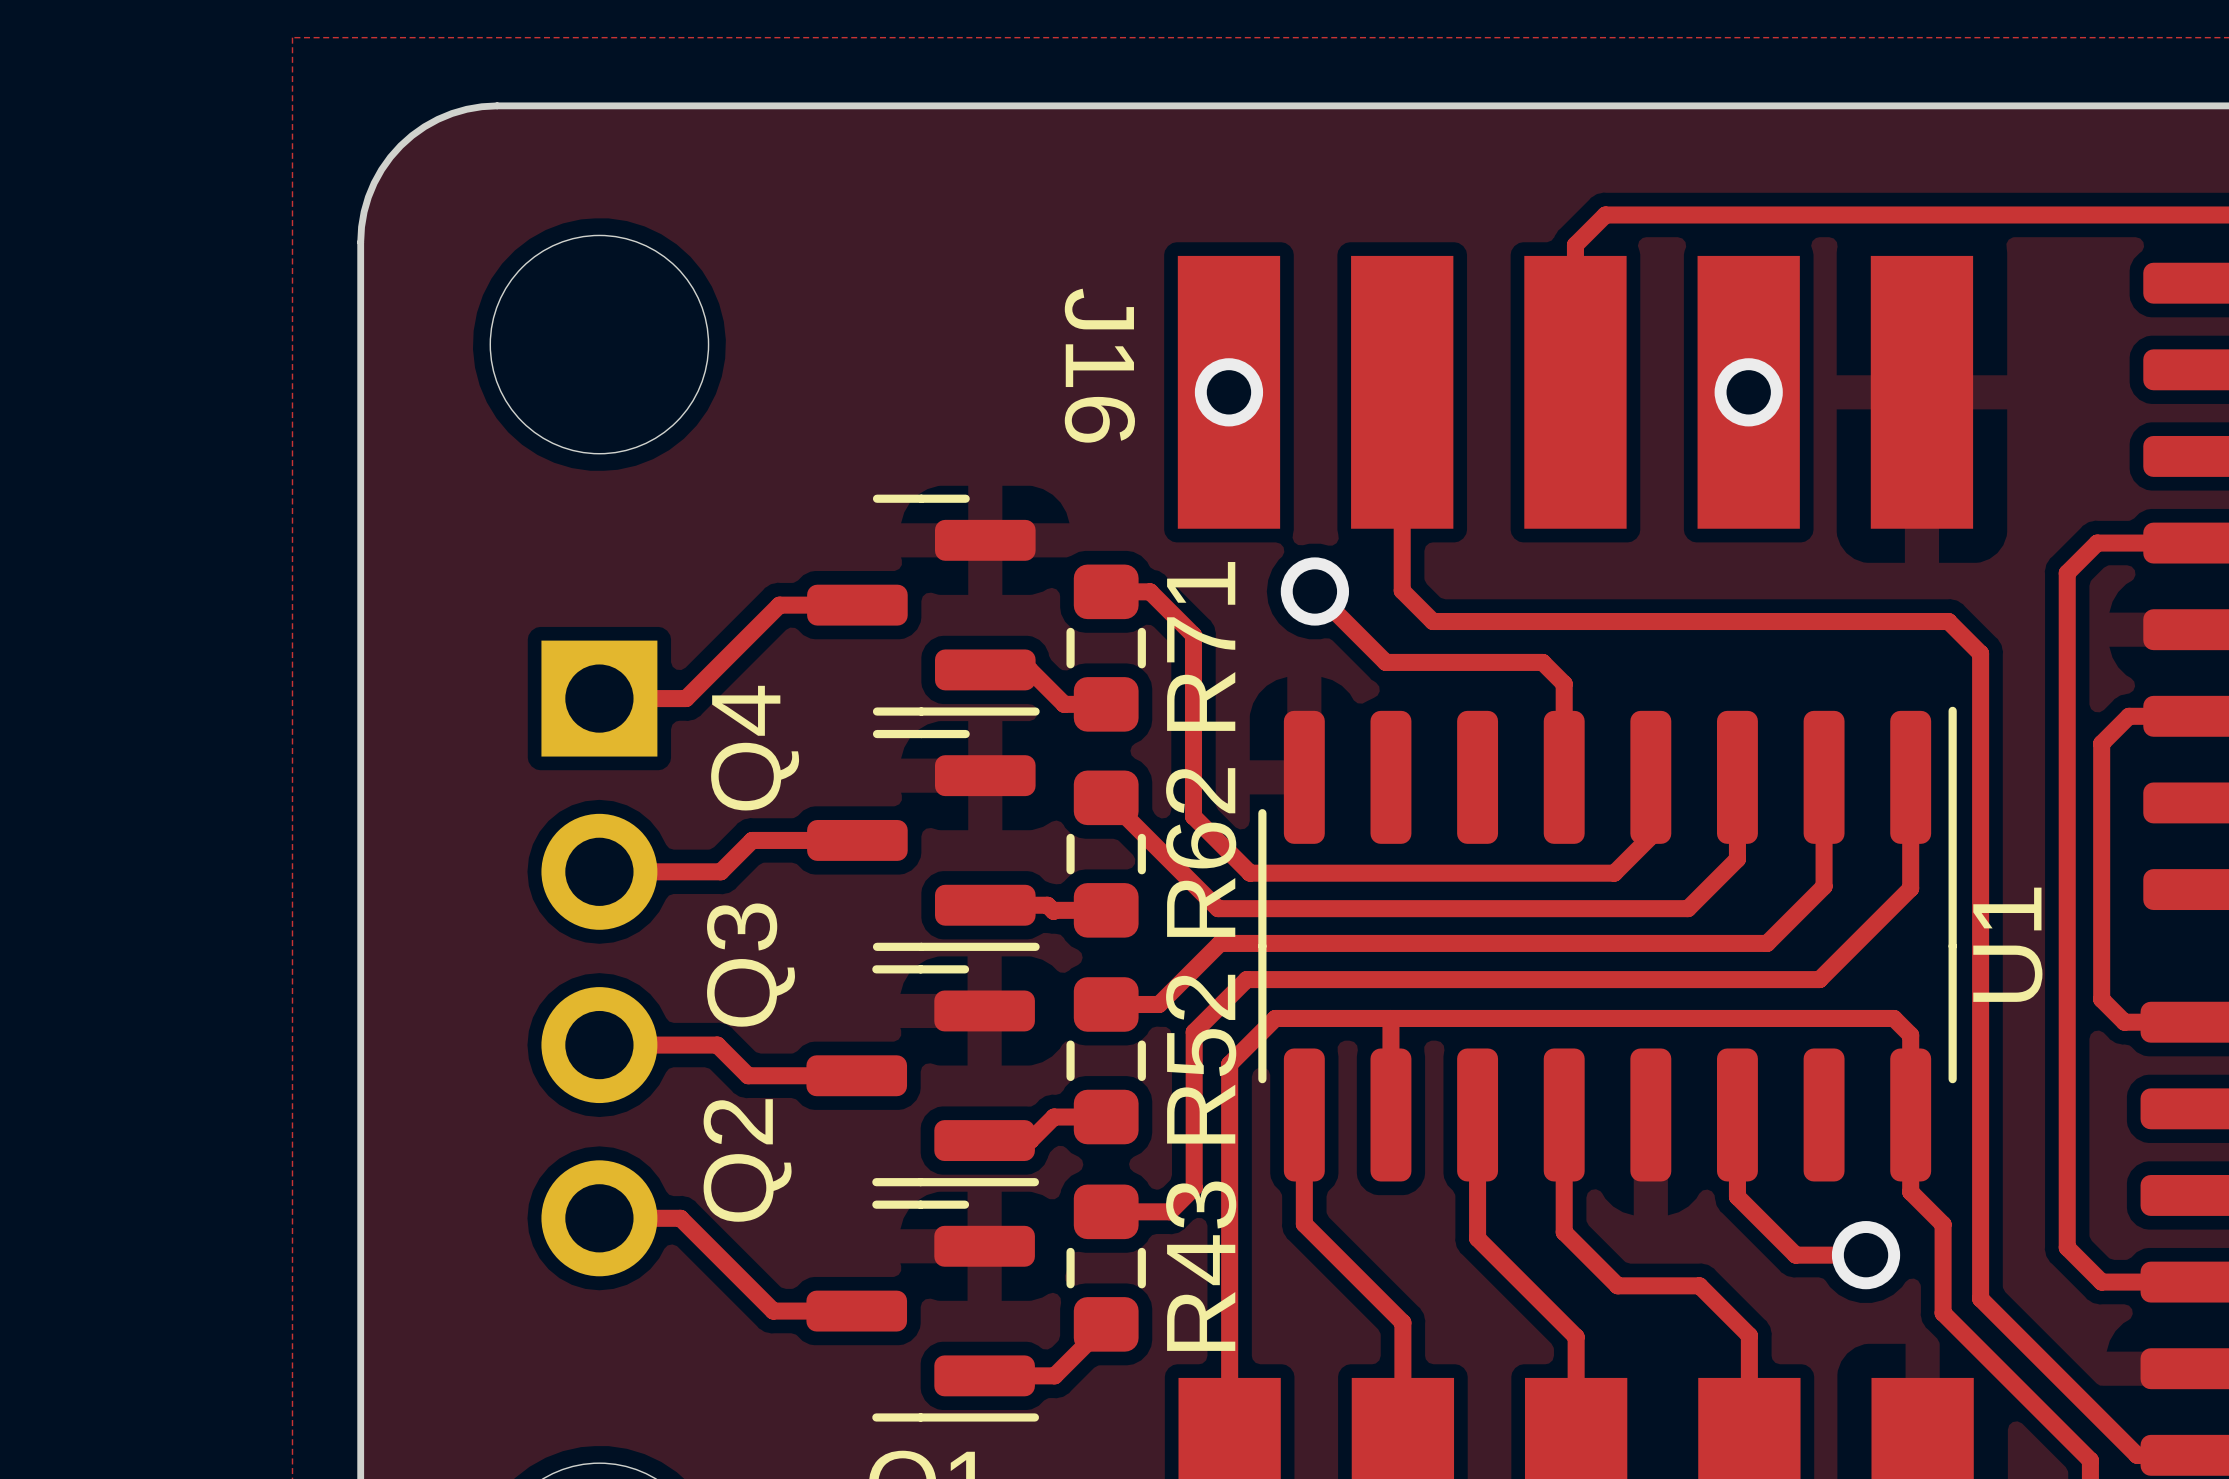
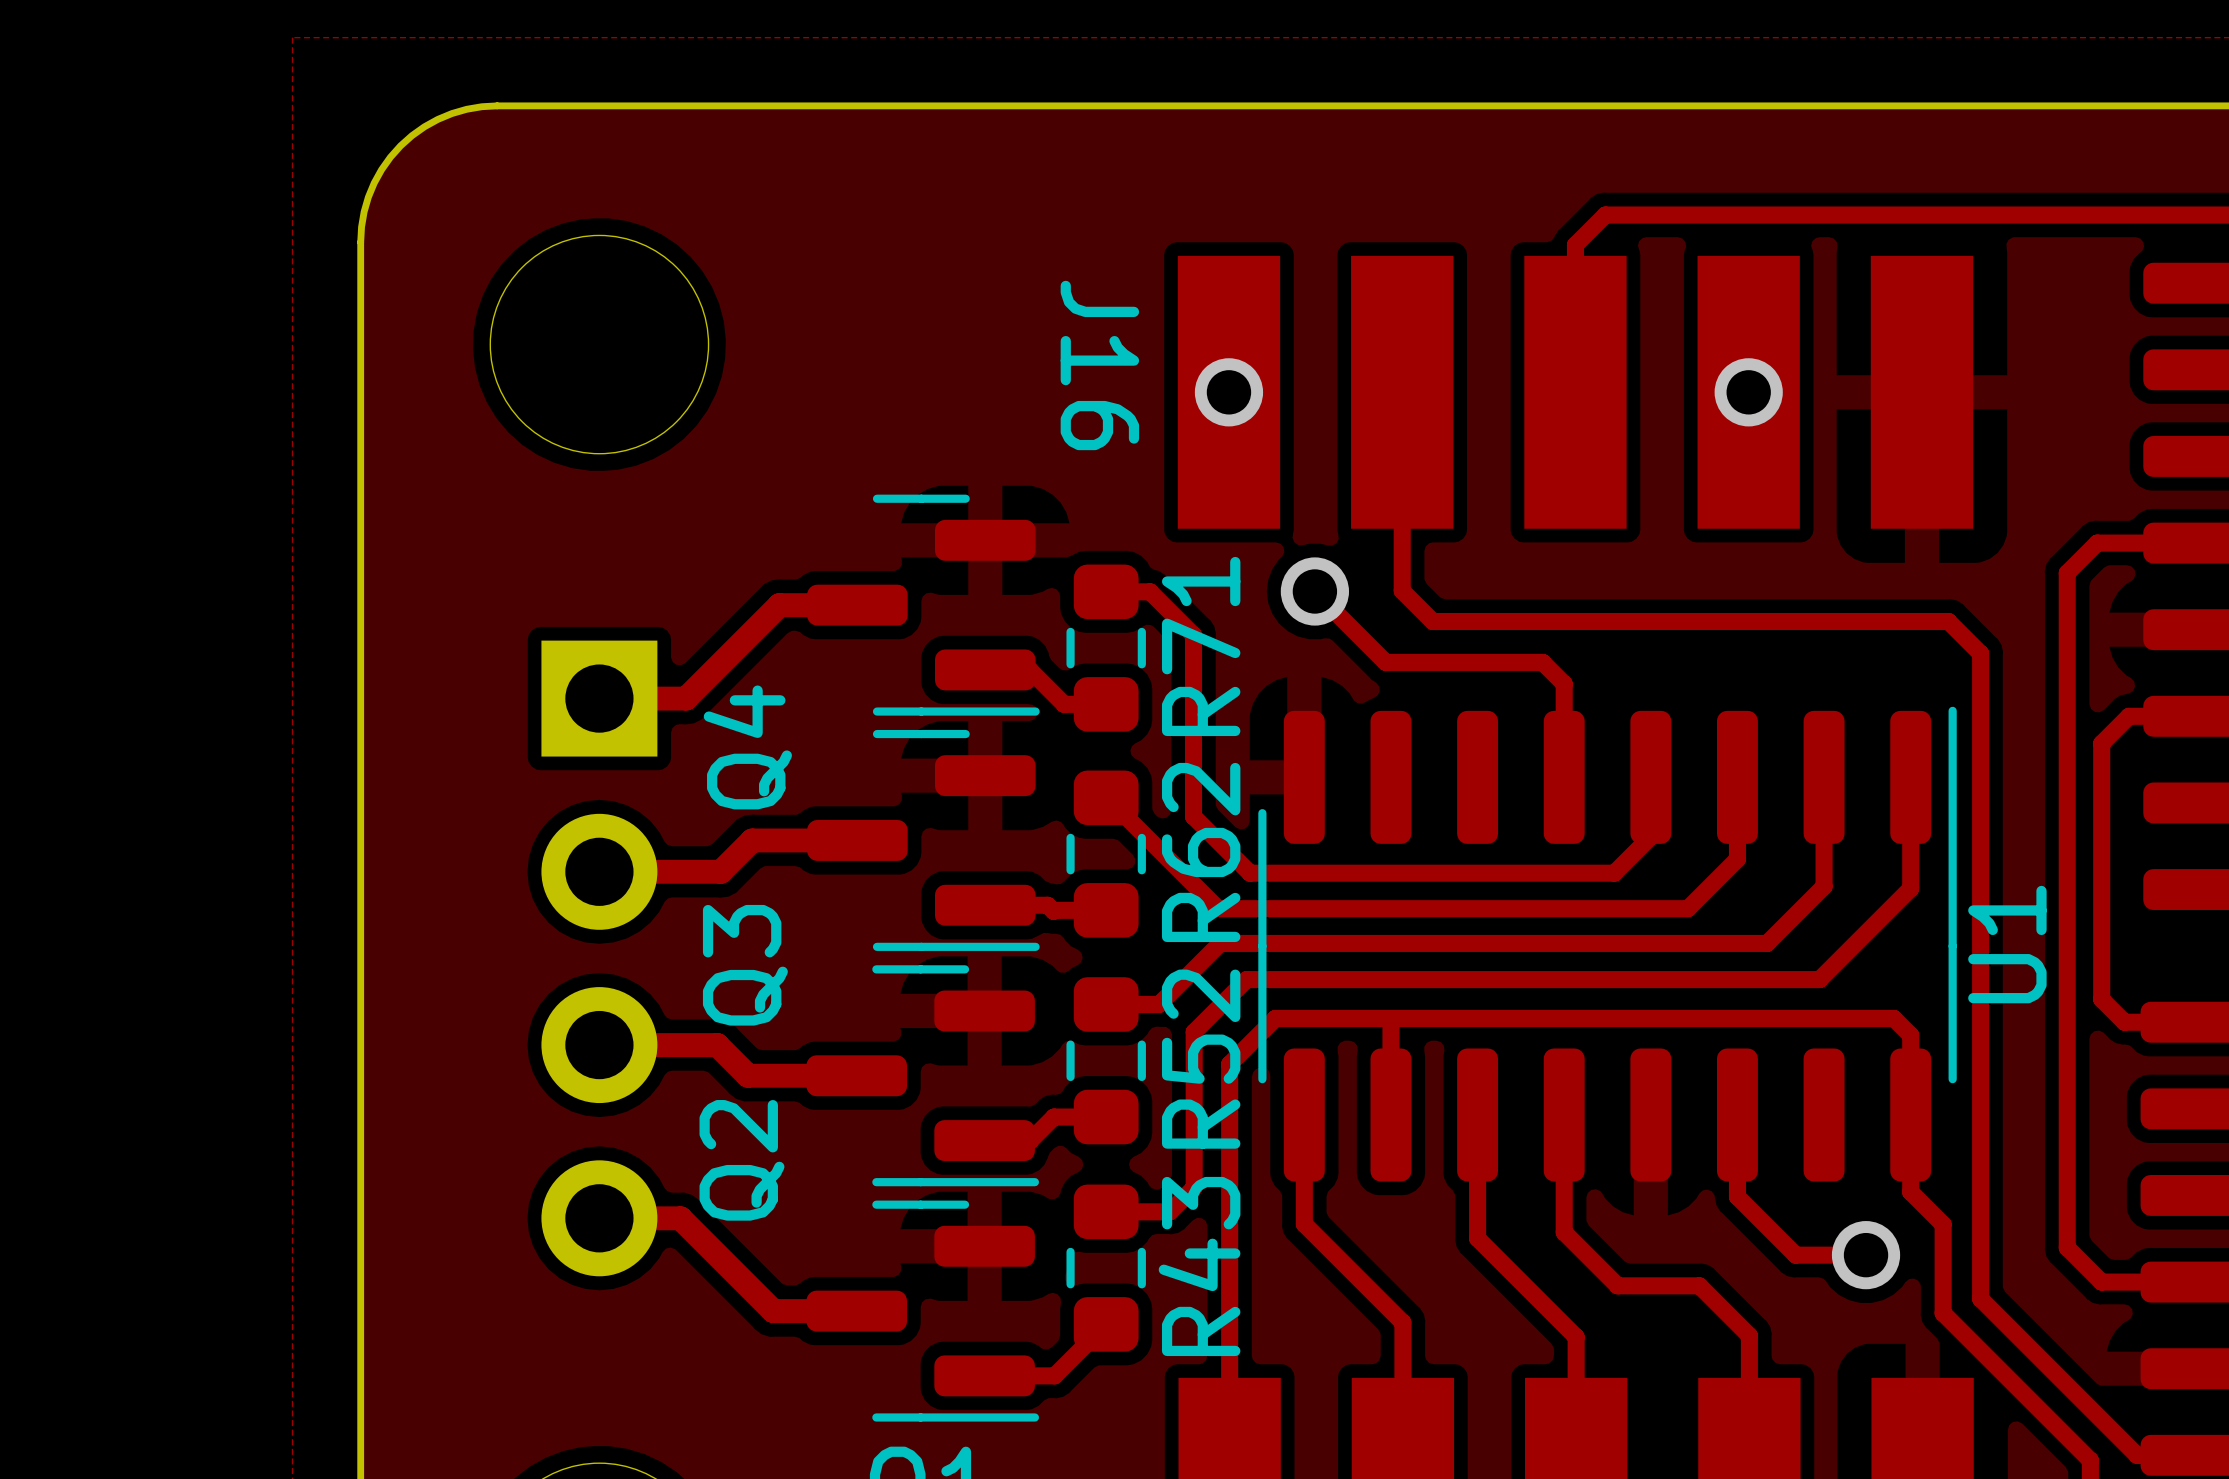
track width: thin (857, 605) (779, 605) (686, 698) (599, 698) -> thick (857, 605) (779, 605) (686, 698) (599, 698)
track width: thin (857, 840) (752, 840) (720, 871) (599, 871) -> thick (857, 840) (752, 840) (720, 871) (599, 871)
track width: thin (599, 1045) (717, 1045) (748, 1075) (856, 1075) -> thick (599, 1045) (717, 1045) (748, 1075) (856, 1075)
track width: thin (599, 1218) (680, 1218) (773, 1311) (856, 1311) -> thick (599, 1218) (680, 1218) (773, 1311) (856, 1311)

